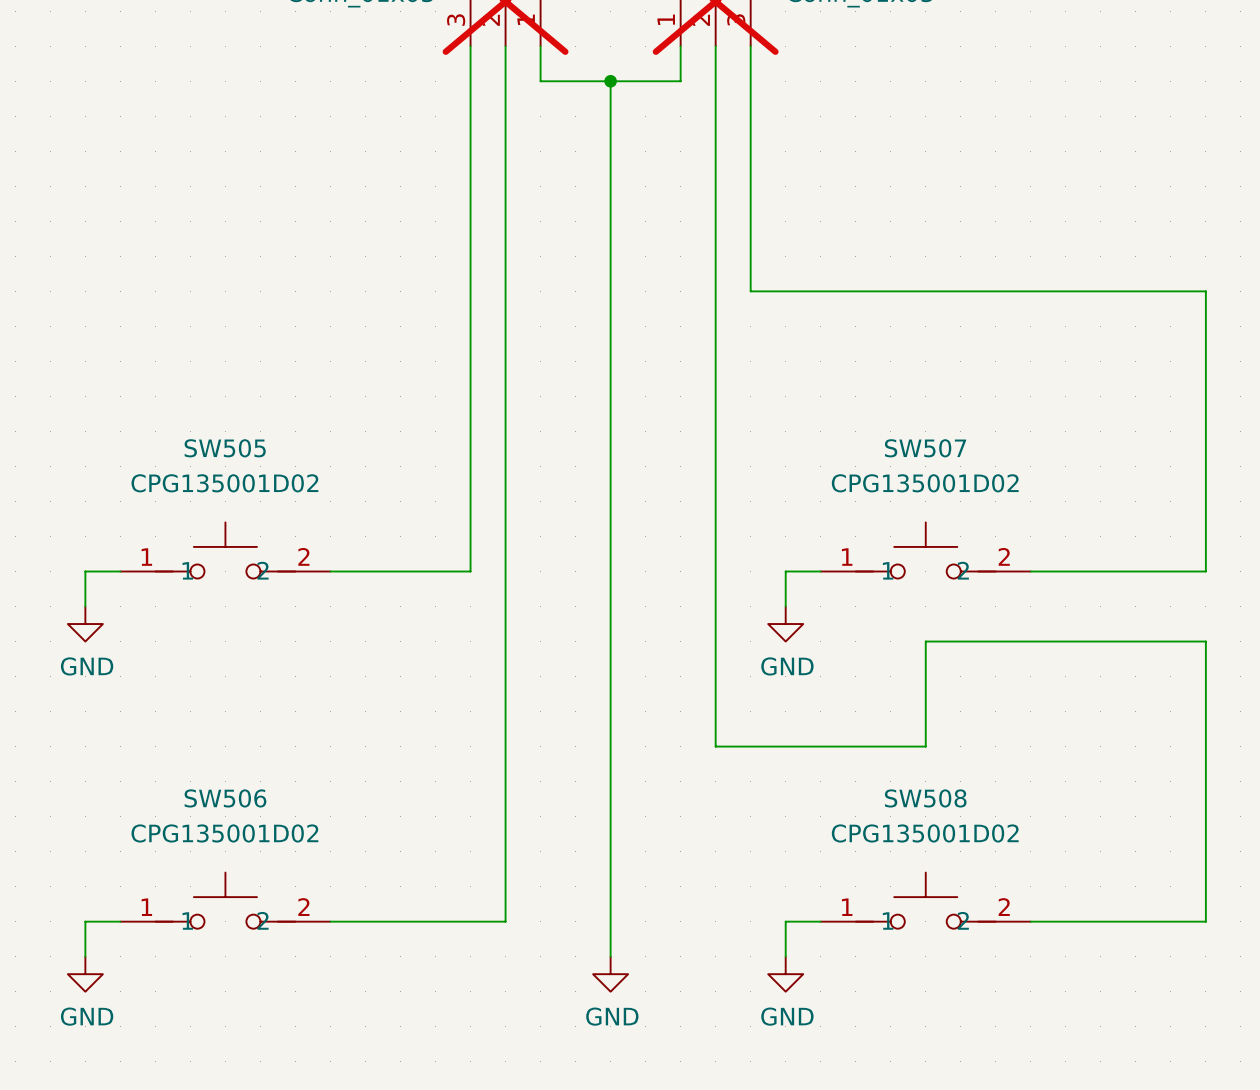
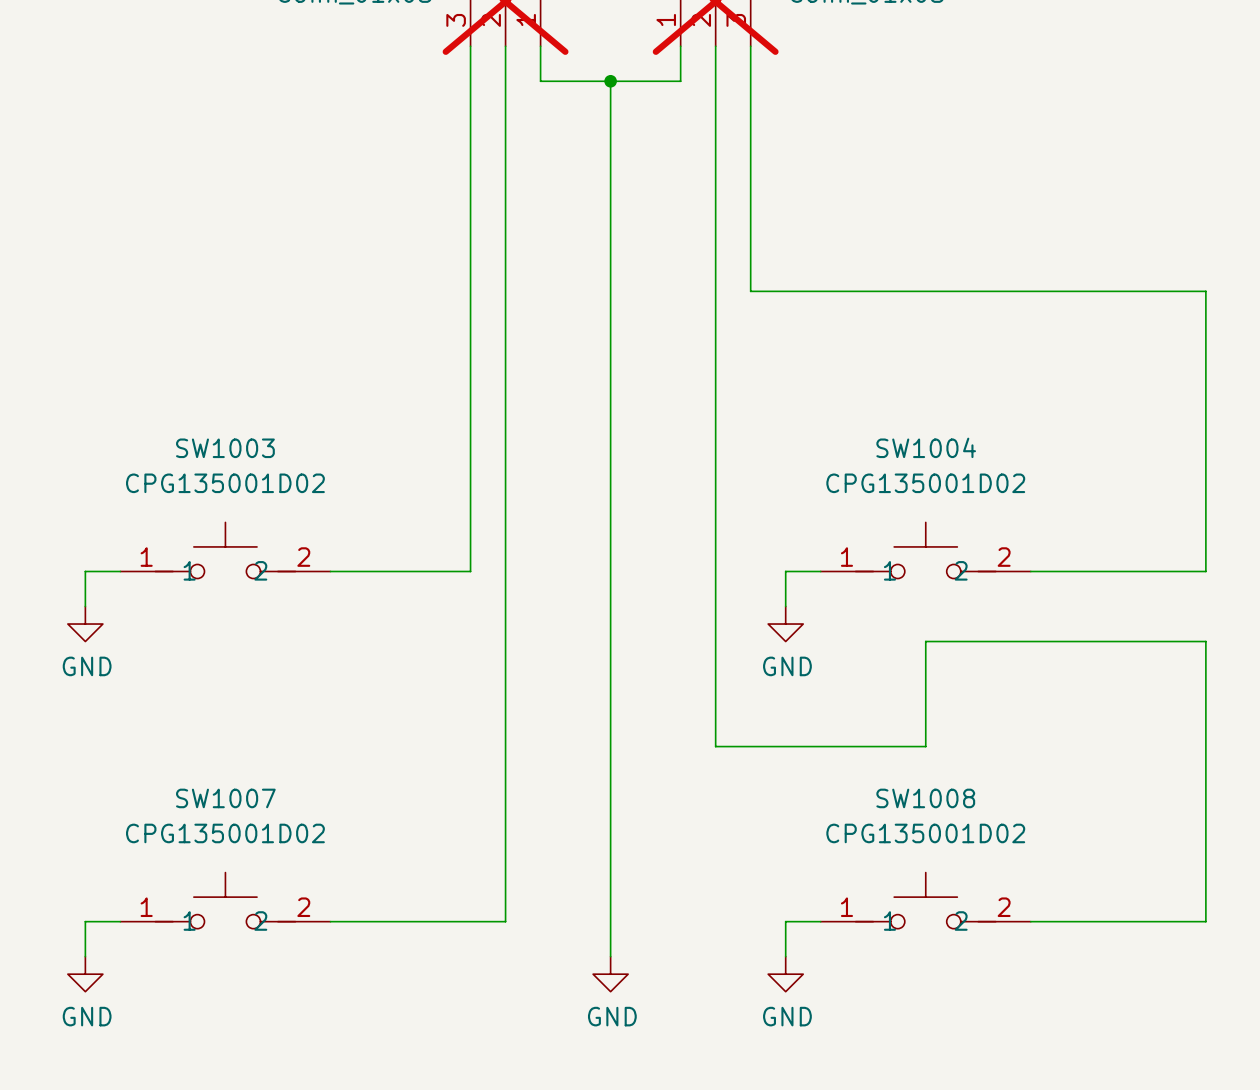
SW505 name: SW505 (225, 448) -> SW1003 (225, 448)
SW507 name: SW507 (925, 448) -> SW1004 (926, 447)
SW506 name: SW506 (225, 798) -> SW1007 (225, 798)
SW508 name: SW508 (925, 798) -> SW1008 (925, 798)

